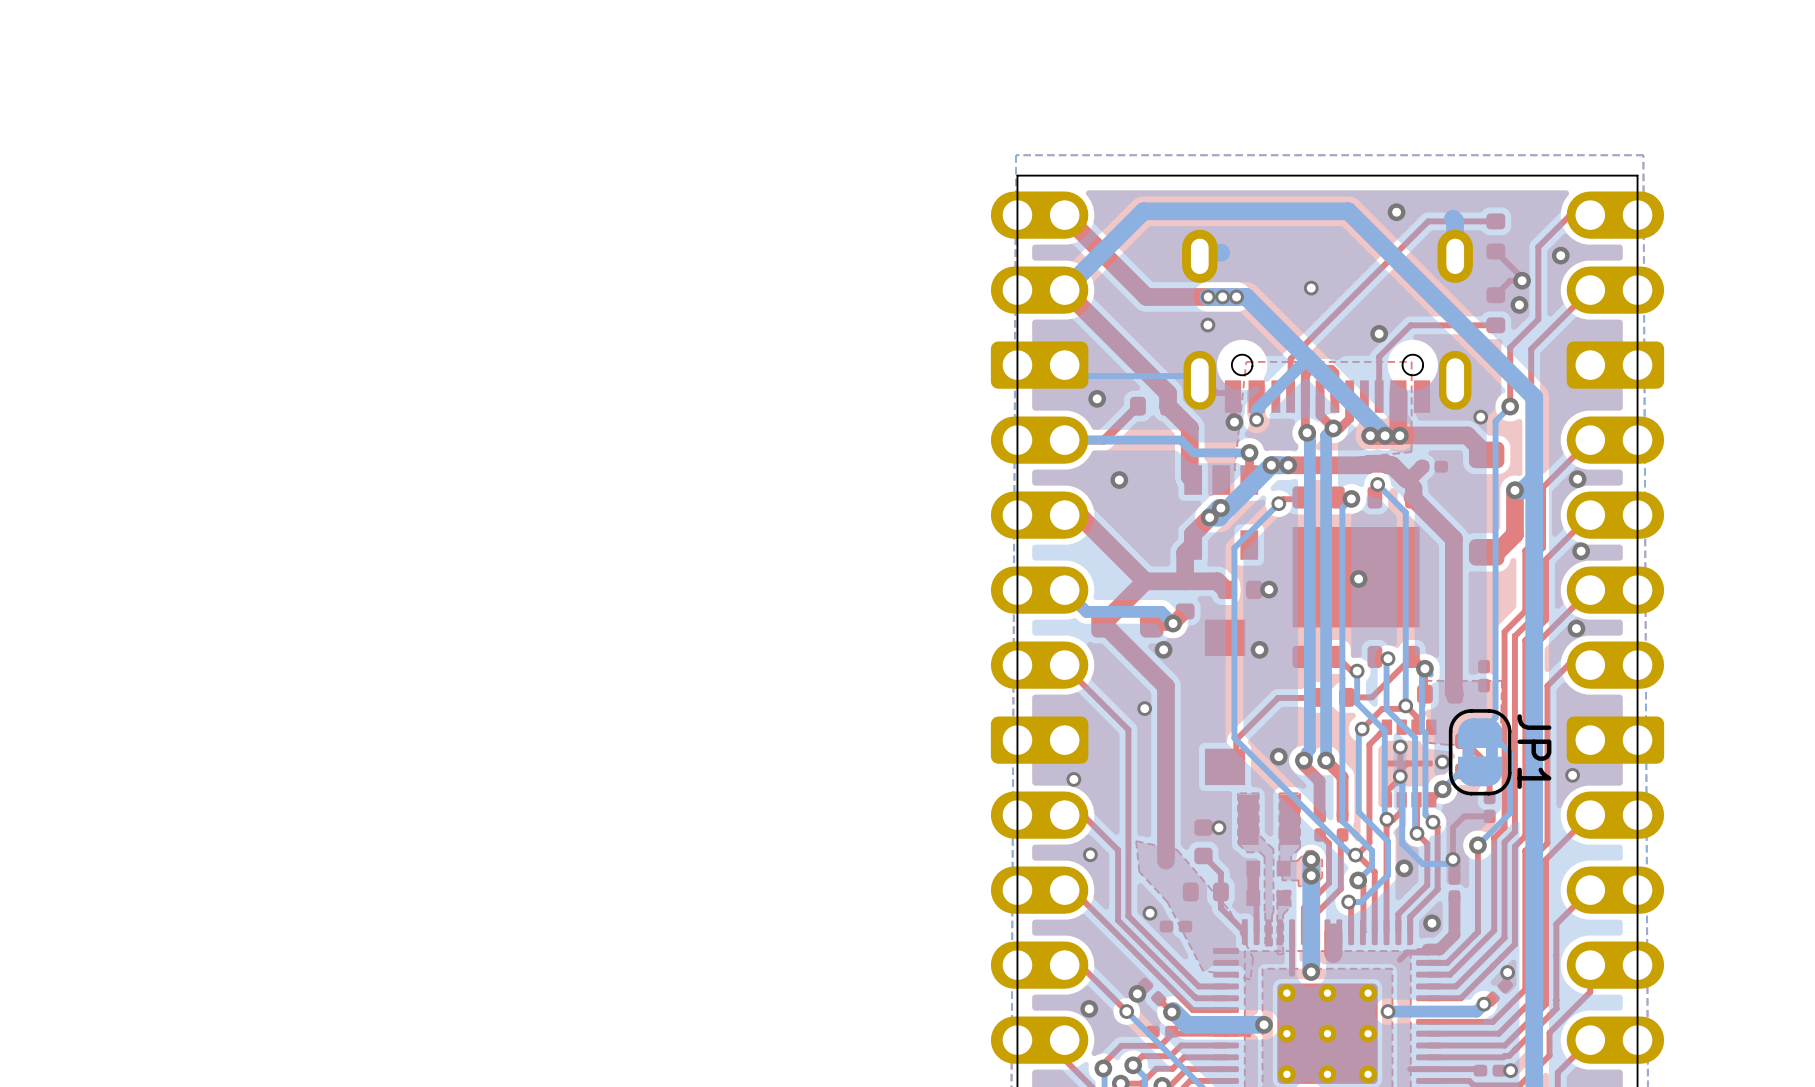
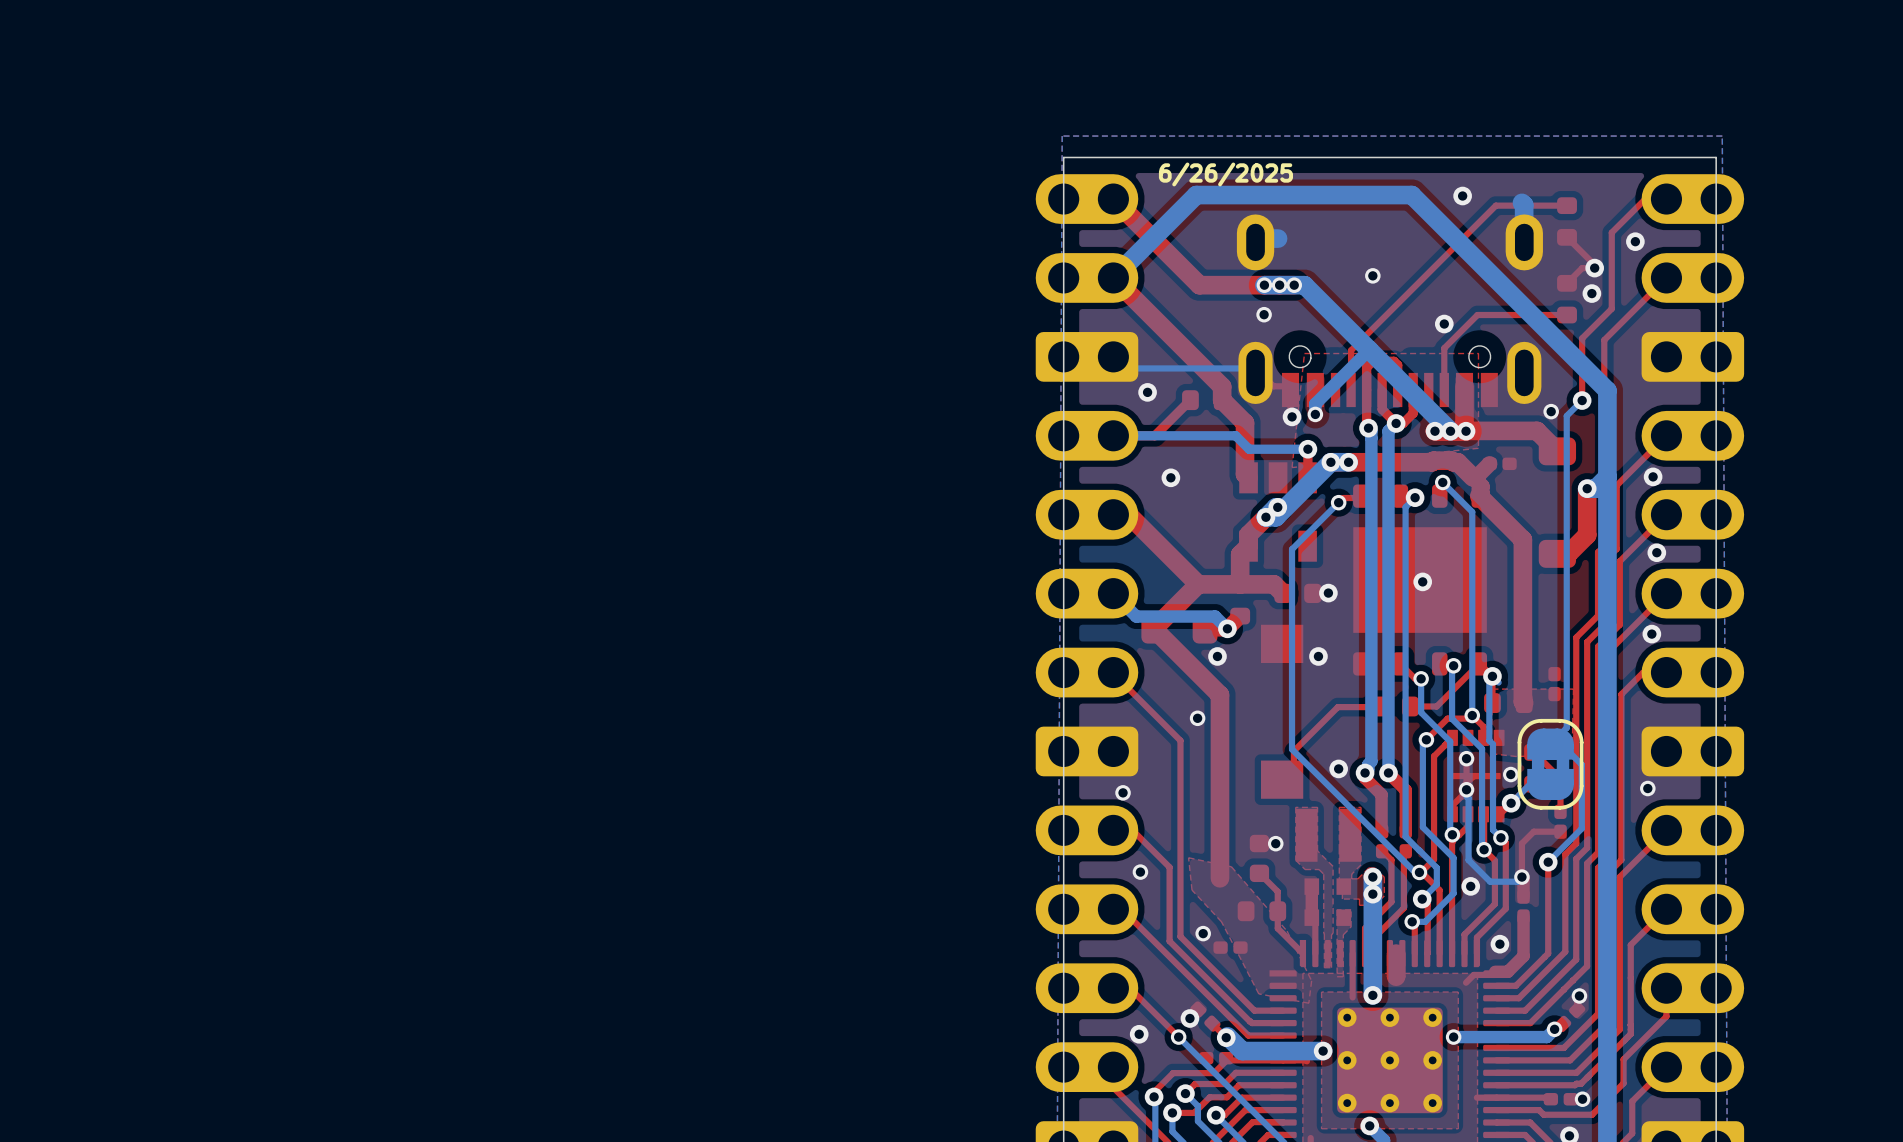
text: none -> 6/26/2025 (1225, 174)
JP1 name: JP1 (1534, 751) -> none

